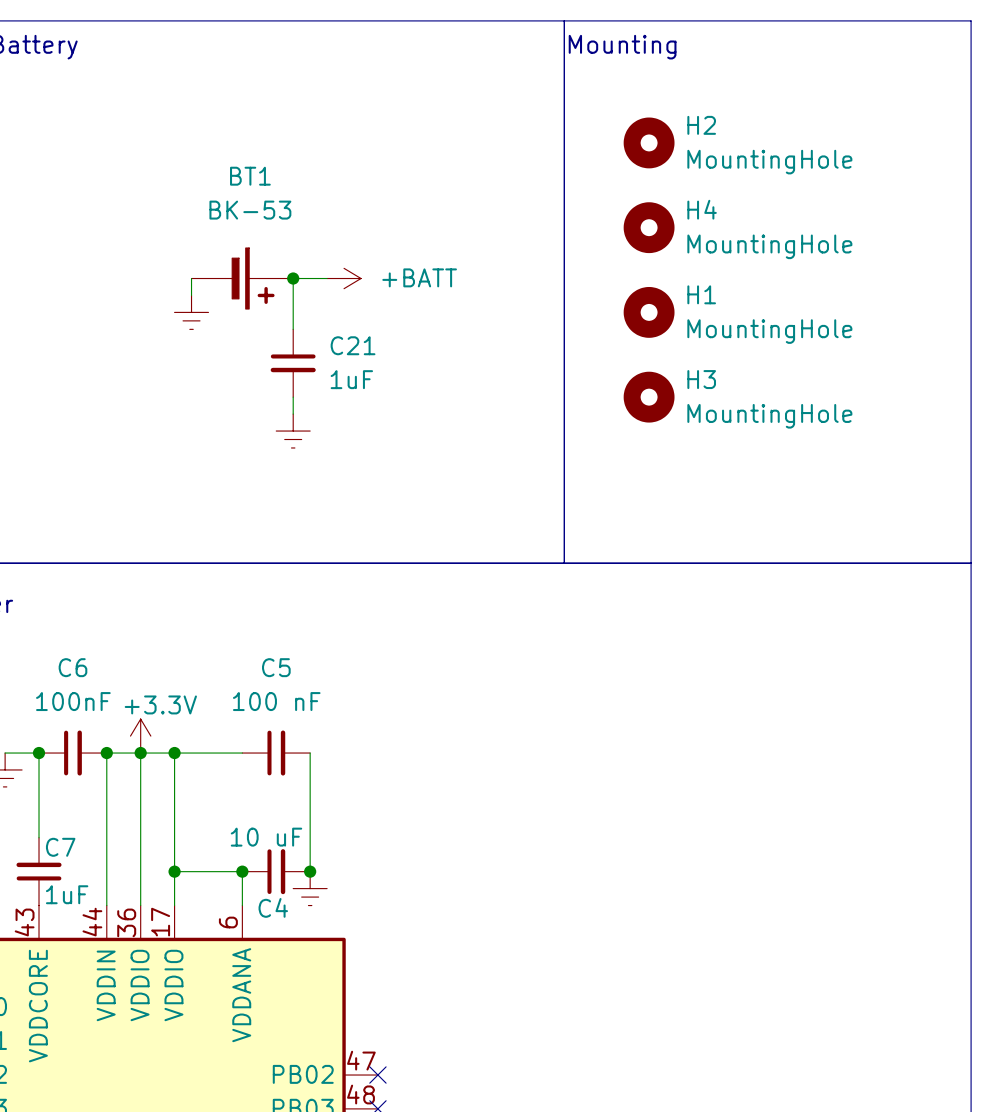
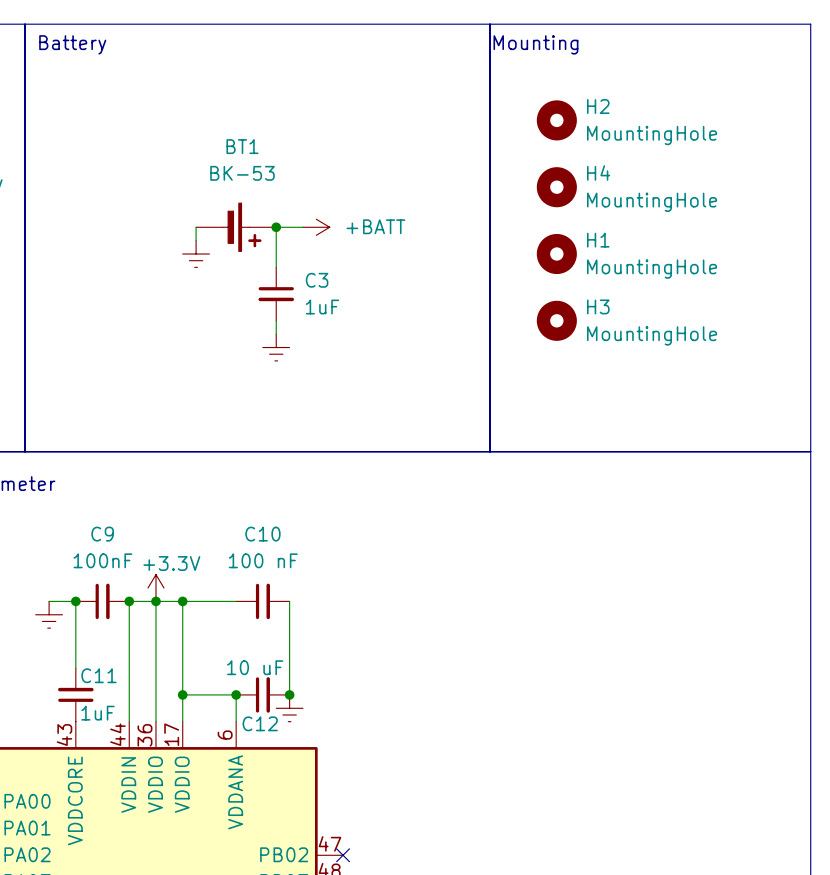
C21 name: C21 (353, 345) -> C3 (317, 280)
C6 name: C6 (72, 667) -> C9 (102, 534)
C5 name: C5 (276, 667) -> C10 (262, 534)
C7 name: C7 (60, 847) -> C11 (98, 675)
C4 name: C4 (273, 907) -> C12 (260, 723)

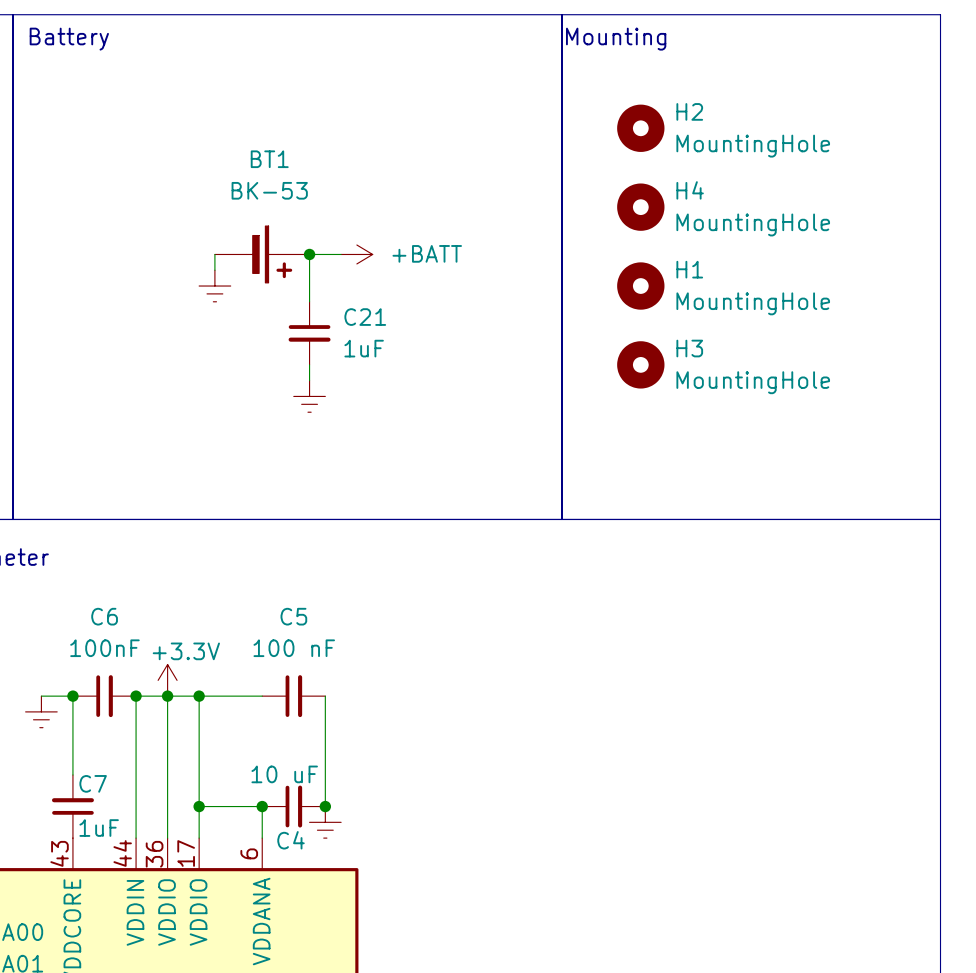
C3 name: C3 (317, 280) -> C21 (365, 317)
C9 name: C9 (102, 534) -> C6 (104, 616)
C10 name: C10 (262, 534) -> C5 (293, 616)
C11 name: C11 (98, 675) -> C7 (93, 783)
C12 name: C12 (260, 723) -> C4 (291, 840)

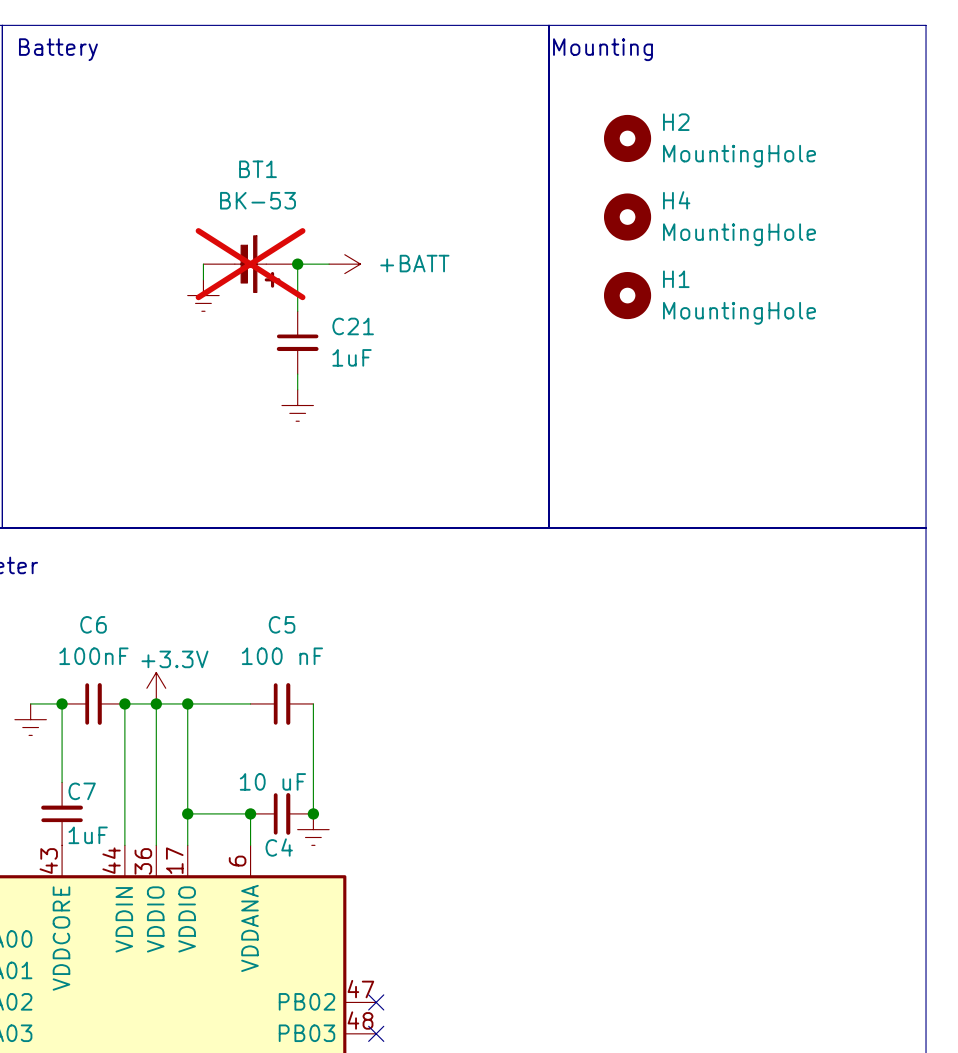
BT1 do-not-place cross: none -> (250, 264)
H3: MountingHole (640, 364) -> none

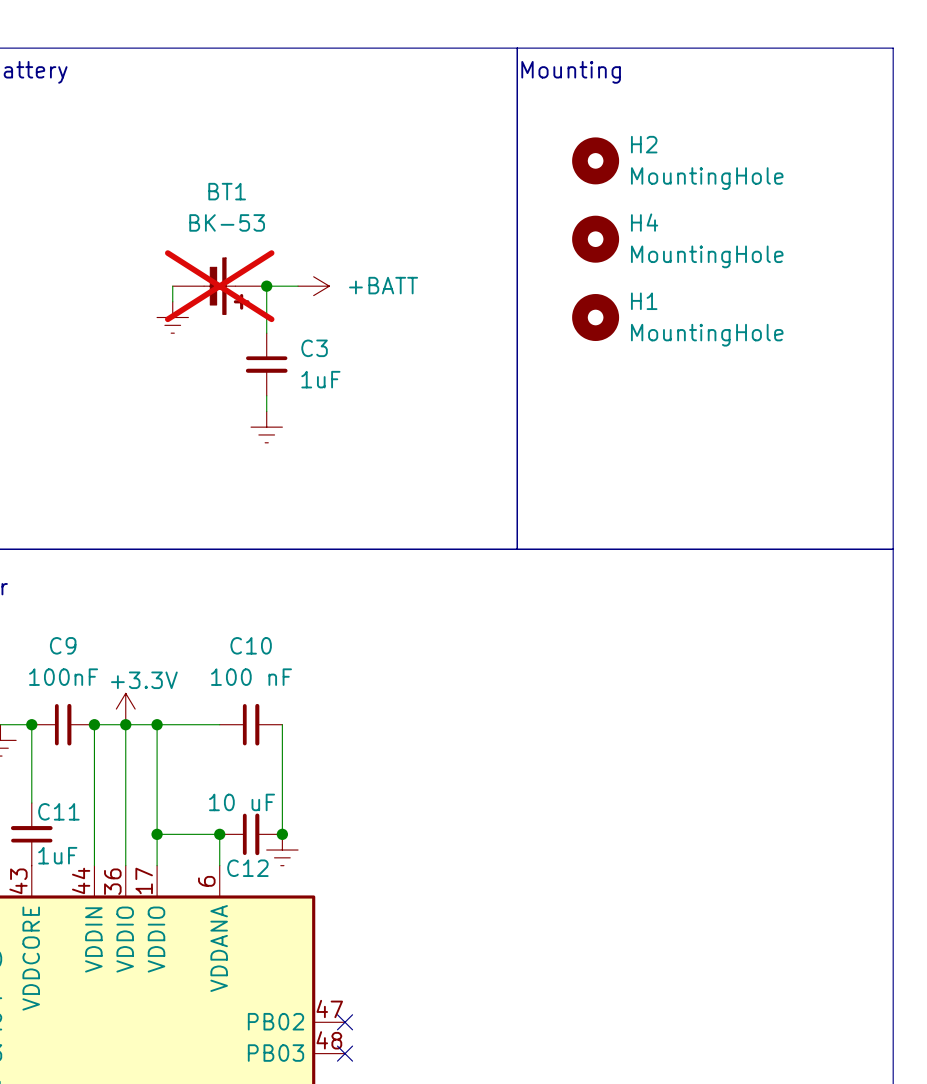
C21 name: C21 (353, 326) -> C3 (314, 348)
C6 name: C6 (93, 624) -> C9 (63, 645)
C5 name: C5 (282, 624) -> C10 (251, 645)
C7 name: C7 (82, 791) -> C11 (58, 811)
C4 name: C4 (279, 847) -> C12 (247, 868)

